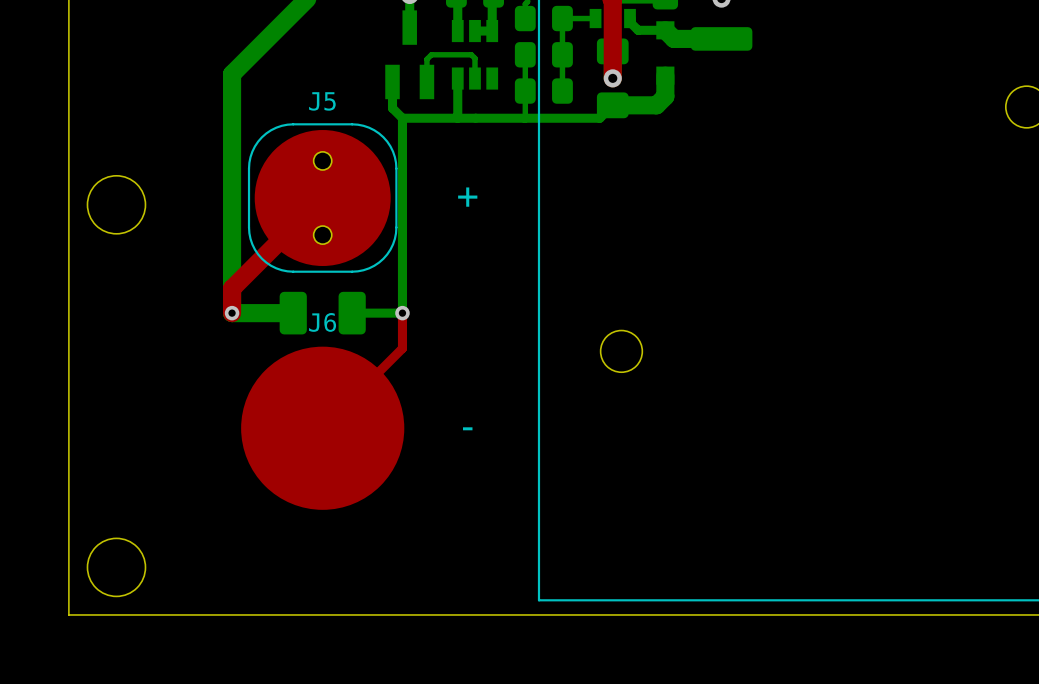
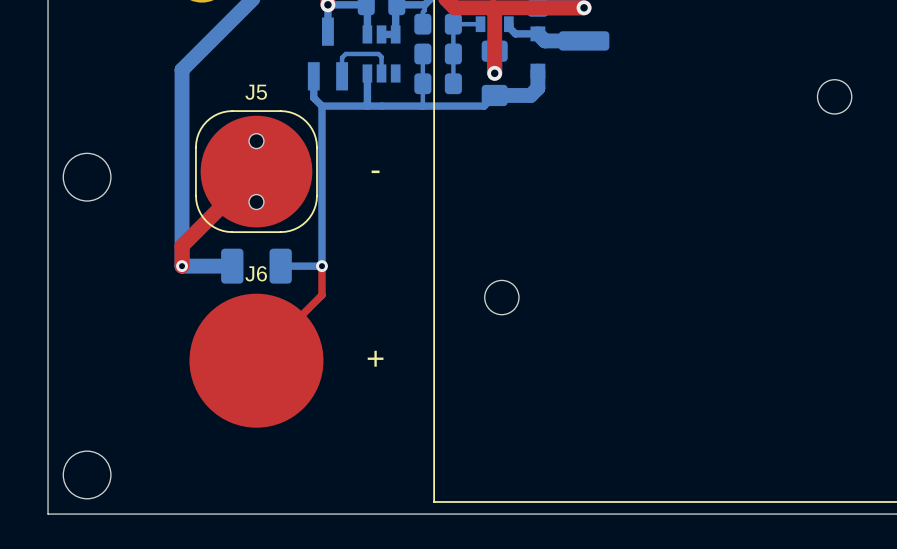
text: + (467, 197) -> - (375, 171)
text: - (467, 428) -> + (375, 358)

